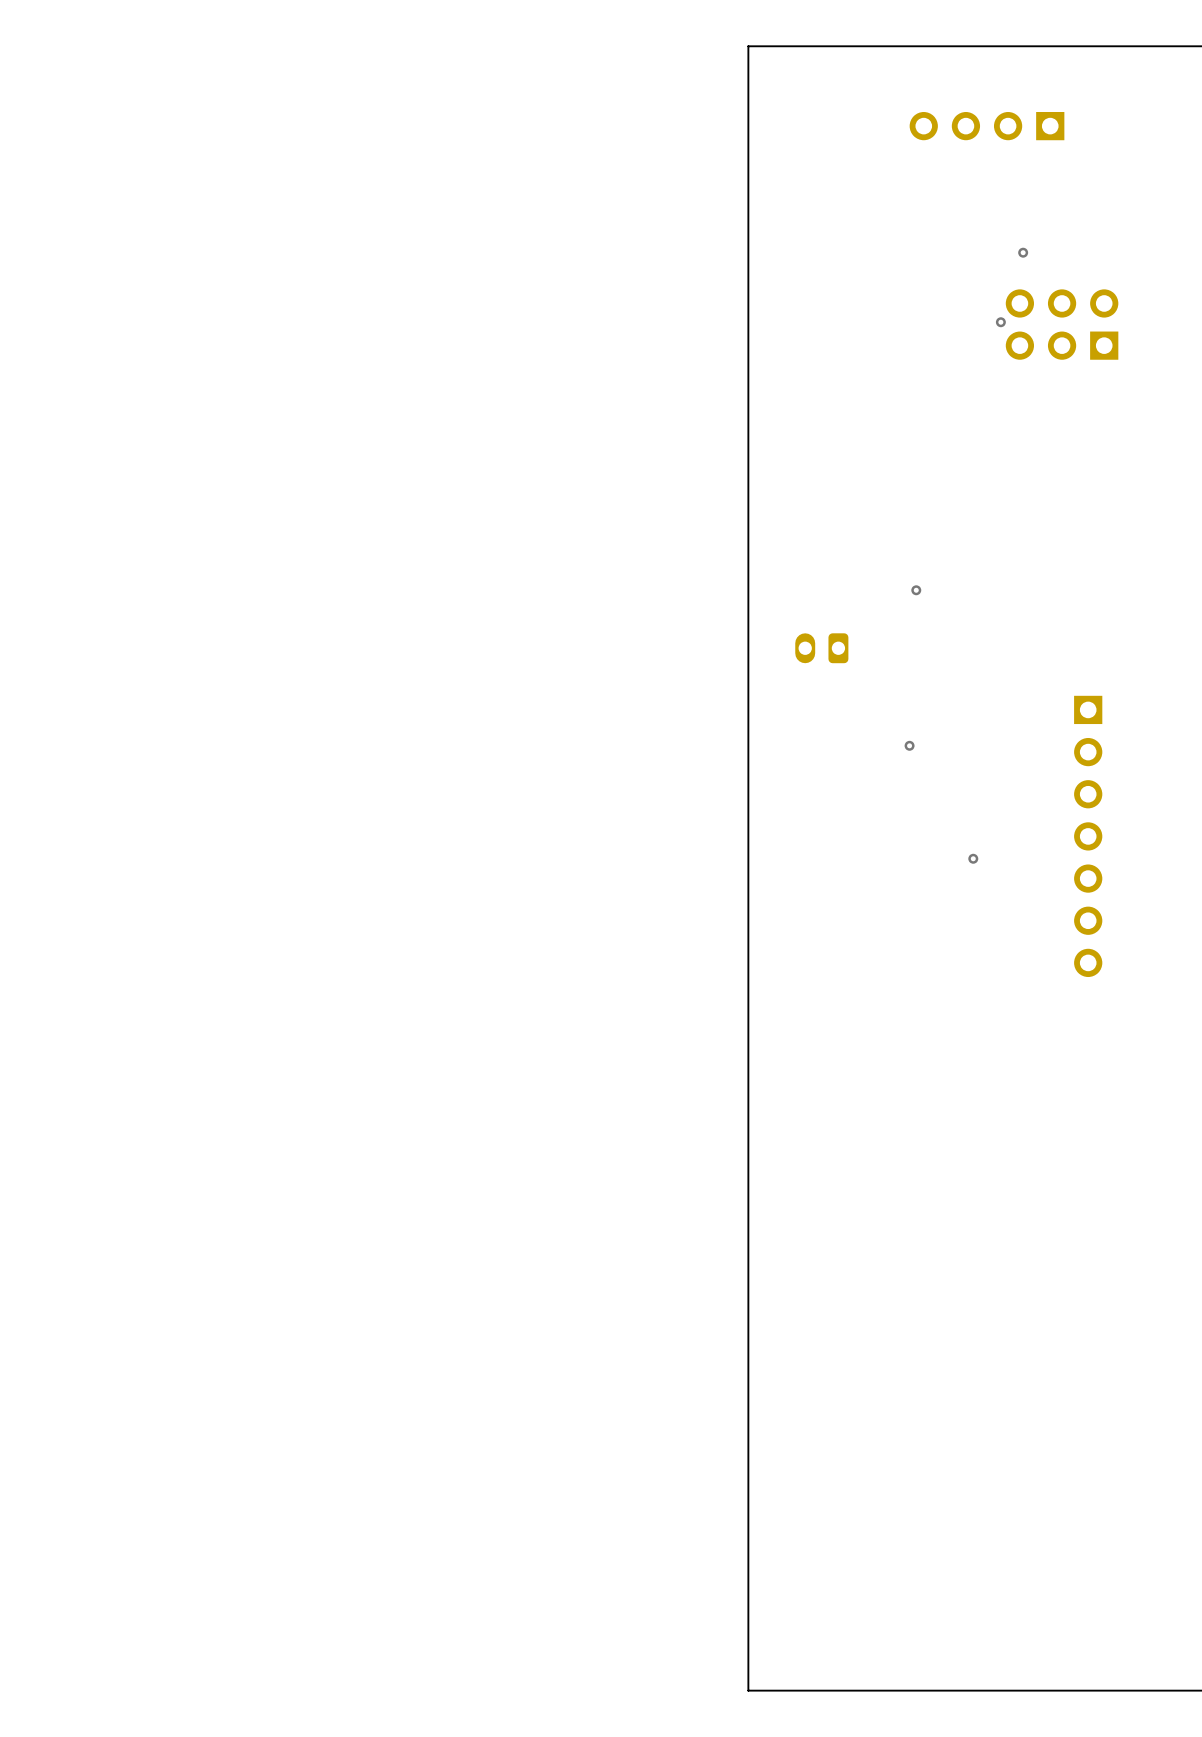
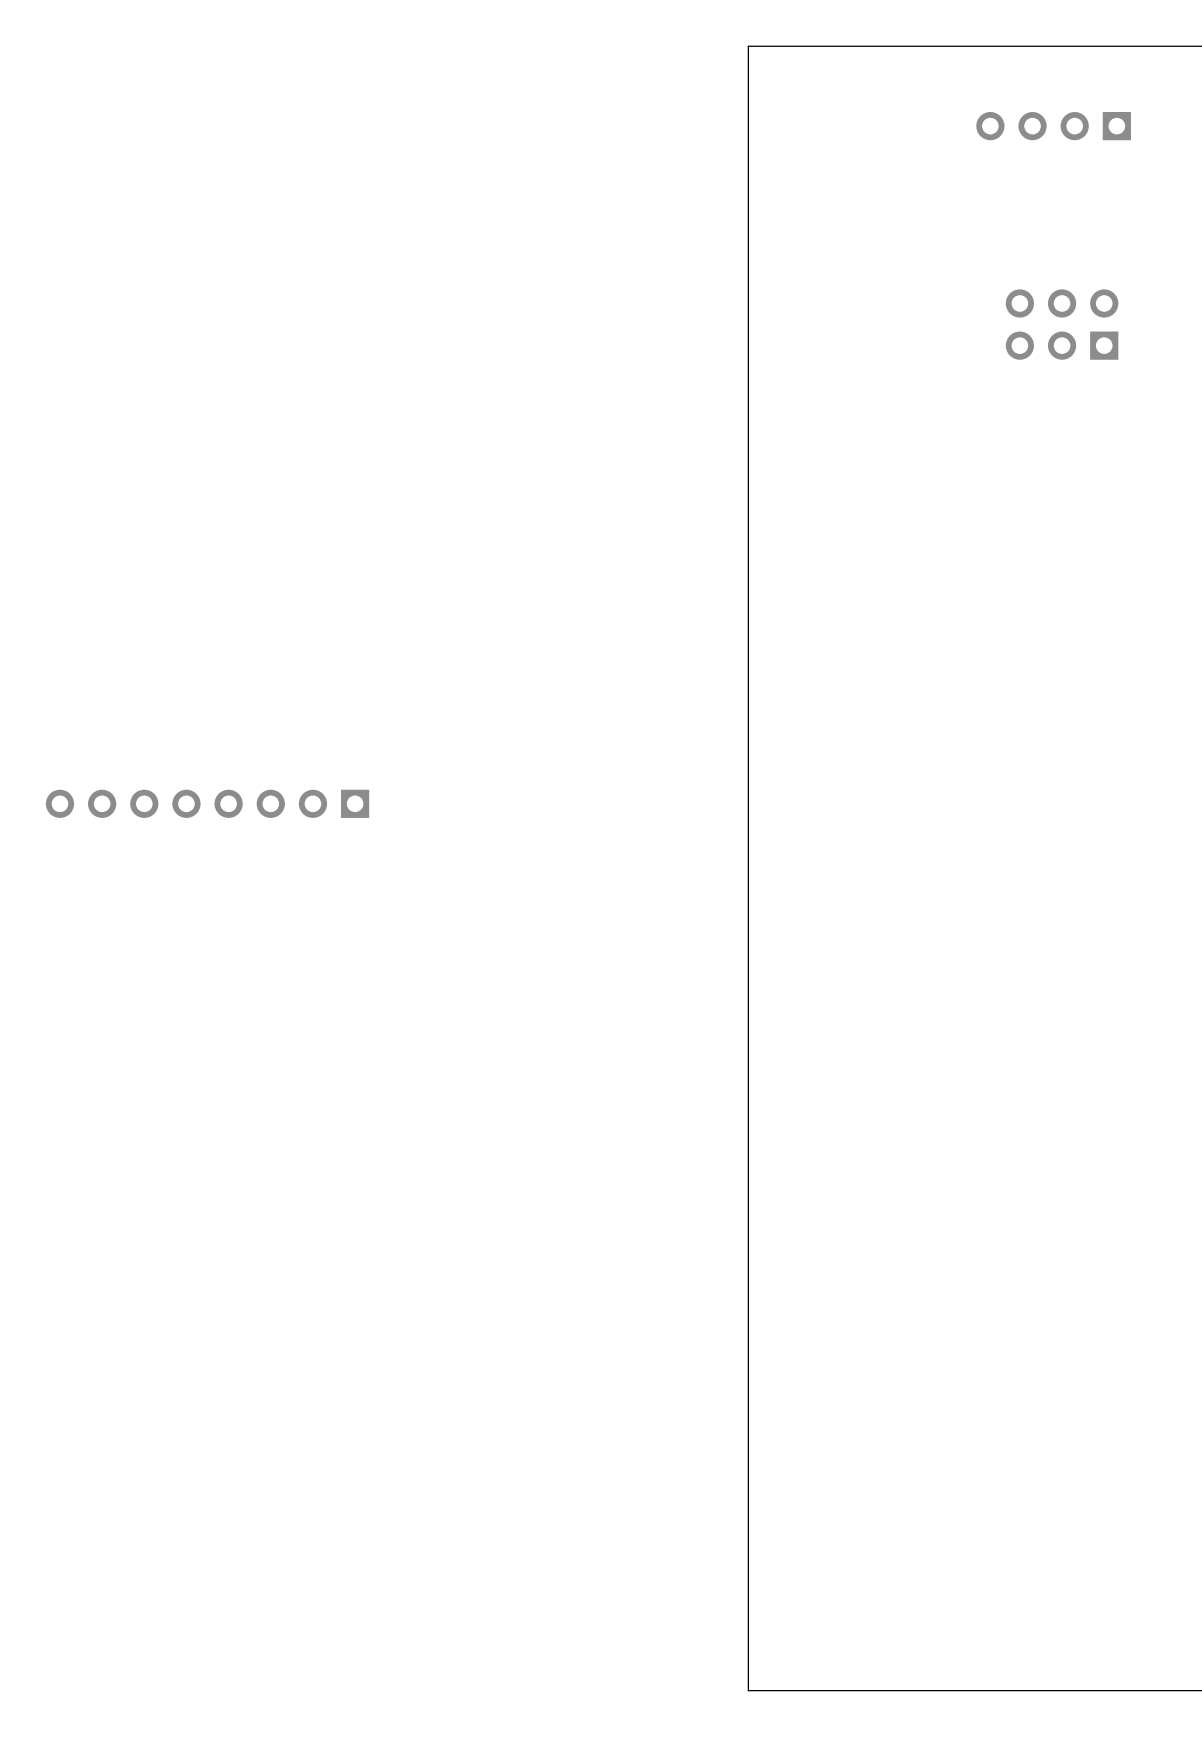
part position: (987, 126) -> (1053, 126)
via: (1023, 252) -> none
via: (1000, 322) -> none
via: (916, 590) -> none
part: (821, 648) -> none
via: (909, 745) -> none
part: none -> (207, 803)
part: (1088, 836) -> none
via: (973, 858) -> none

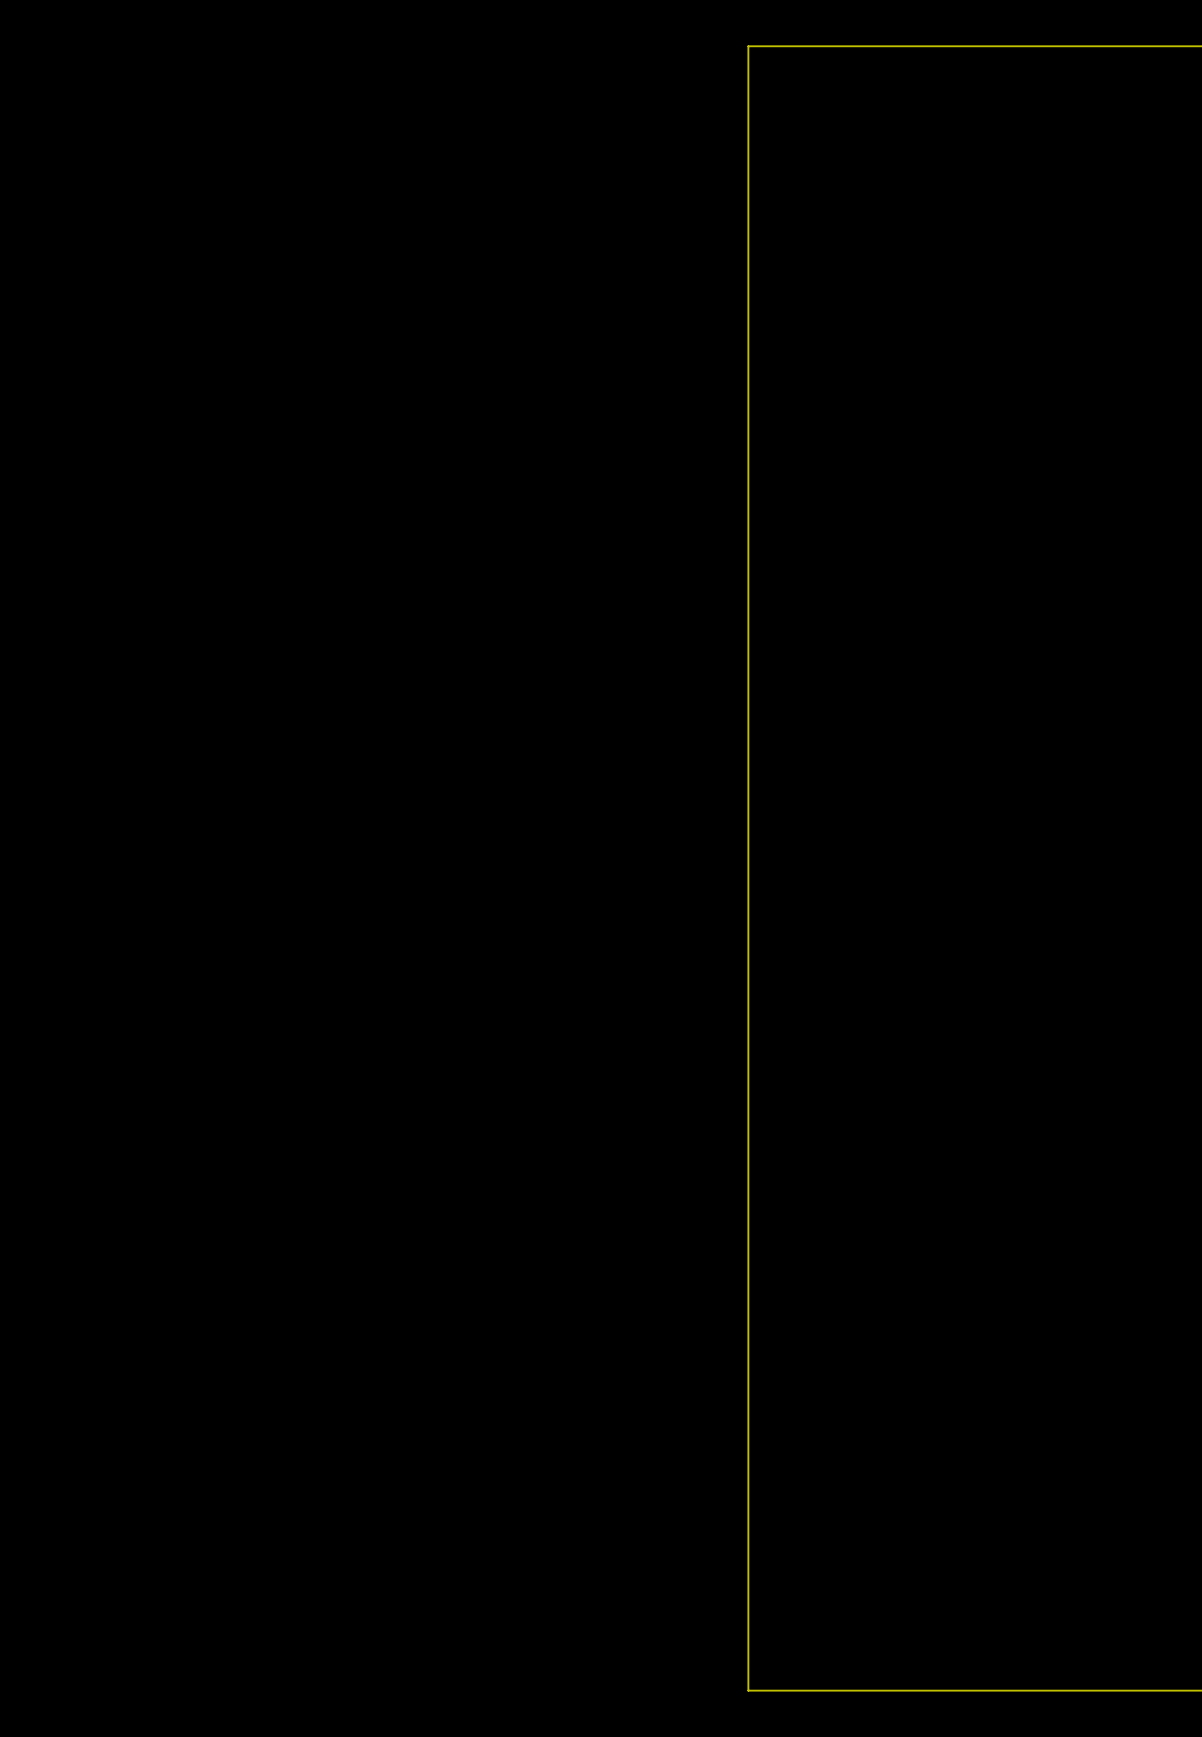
part: (1053, 126) -> none
part: (1062, 324) -> none
part: (207, 803) -> none

